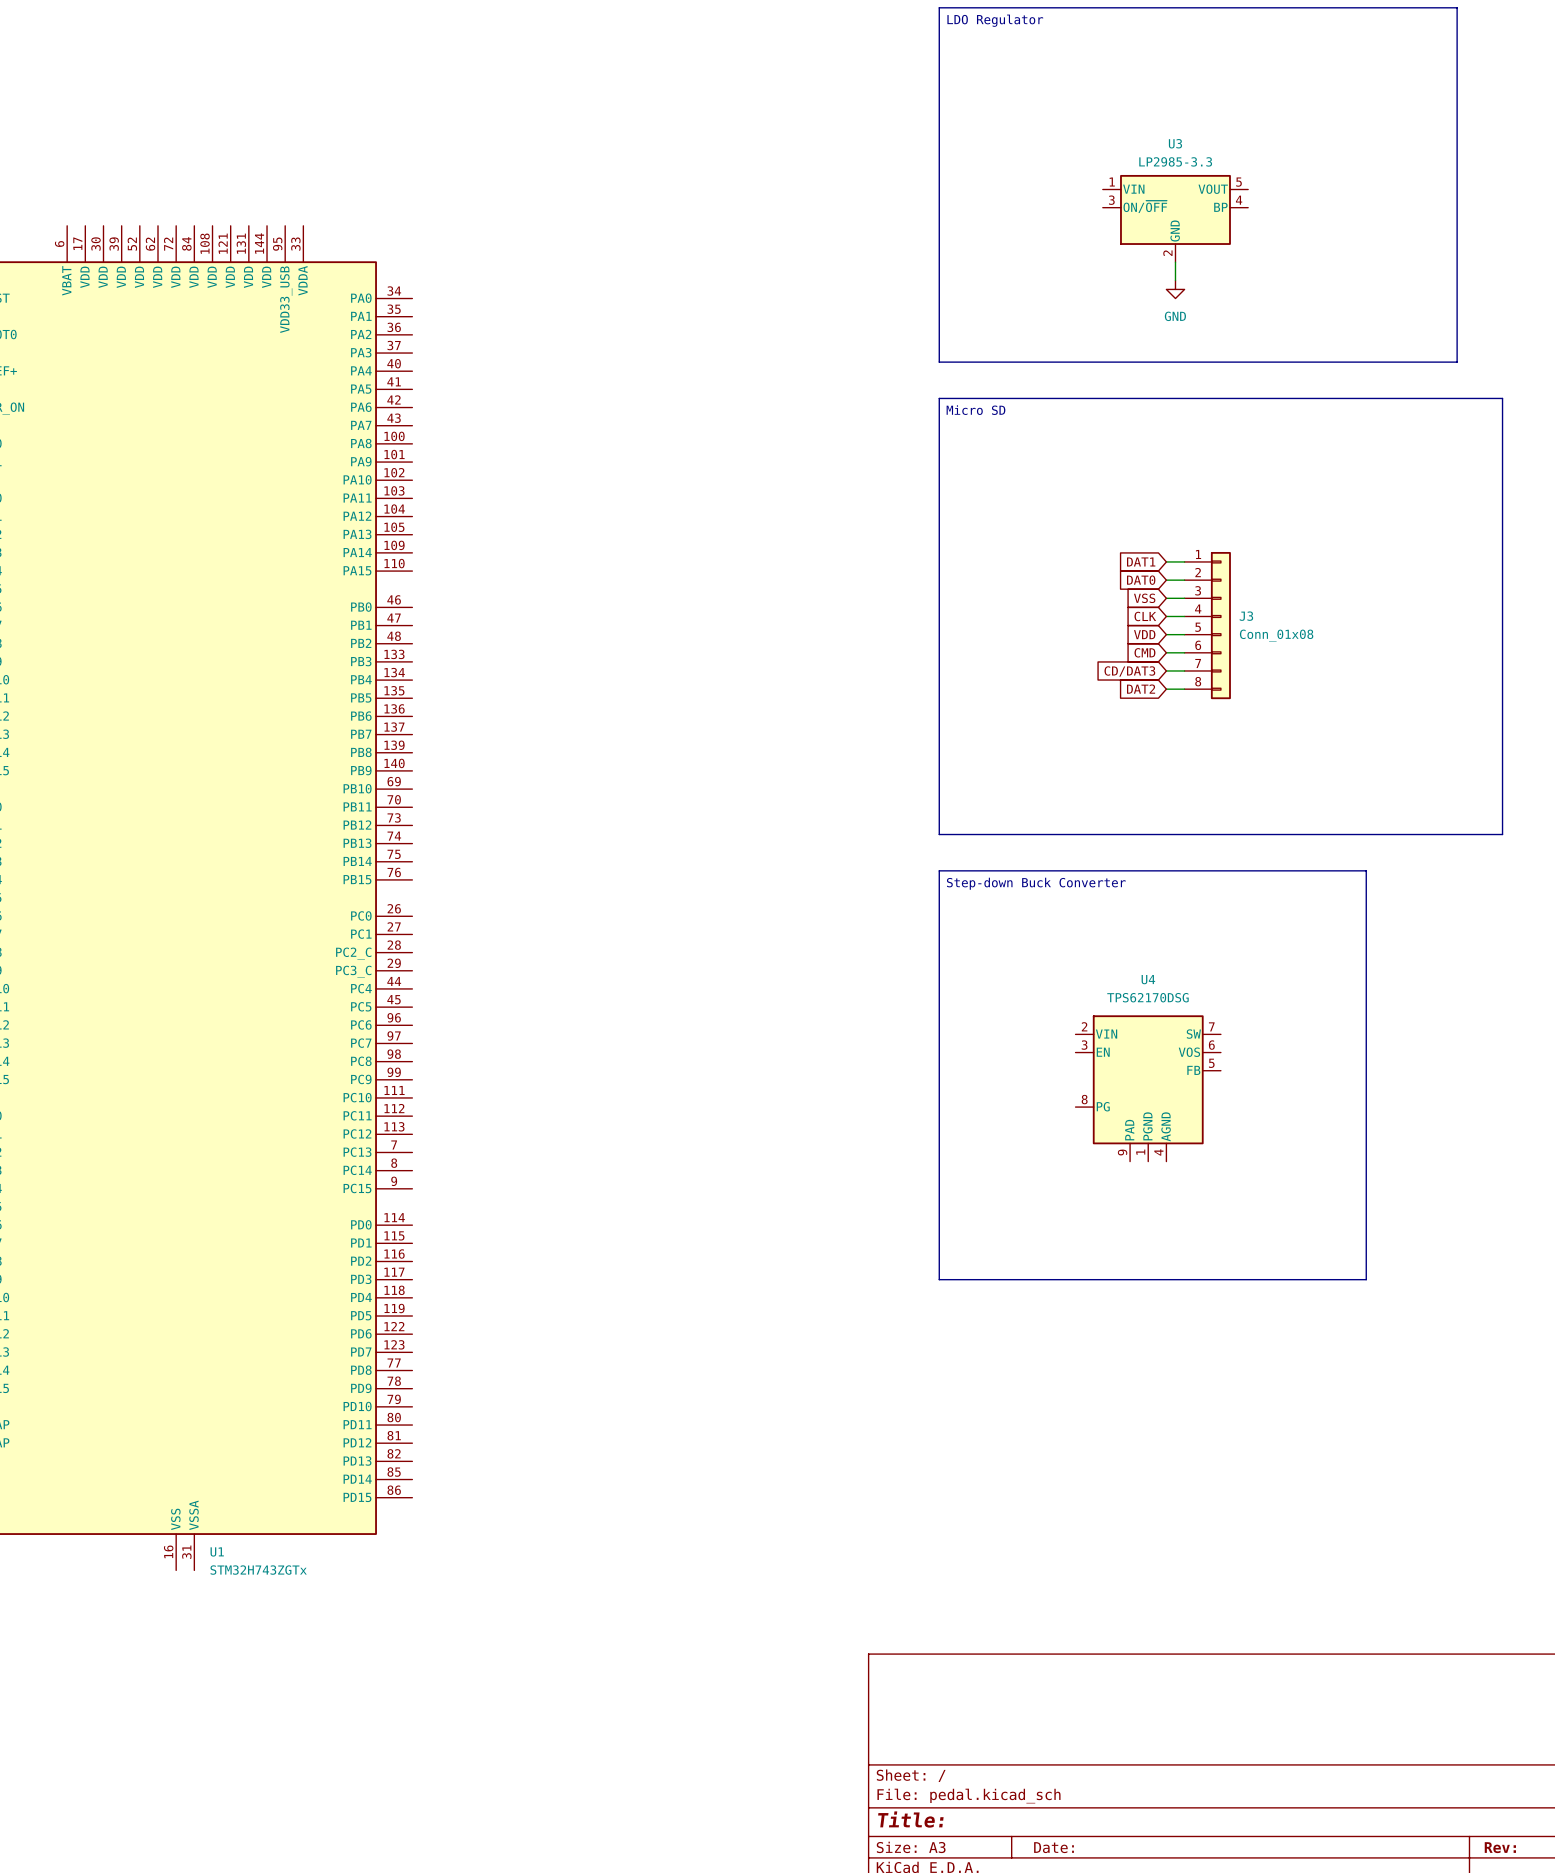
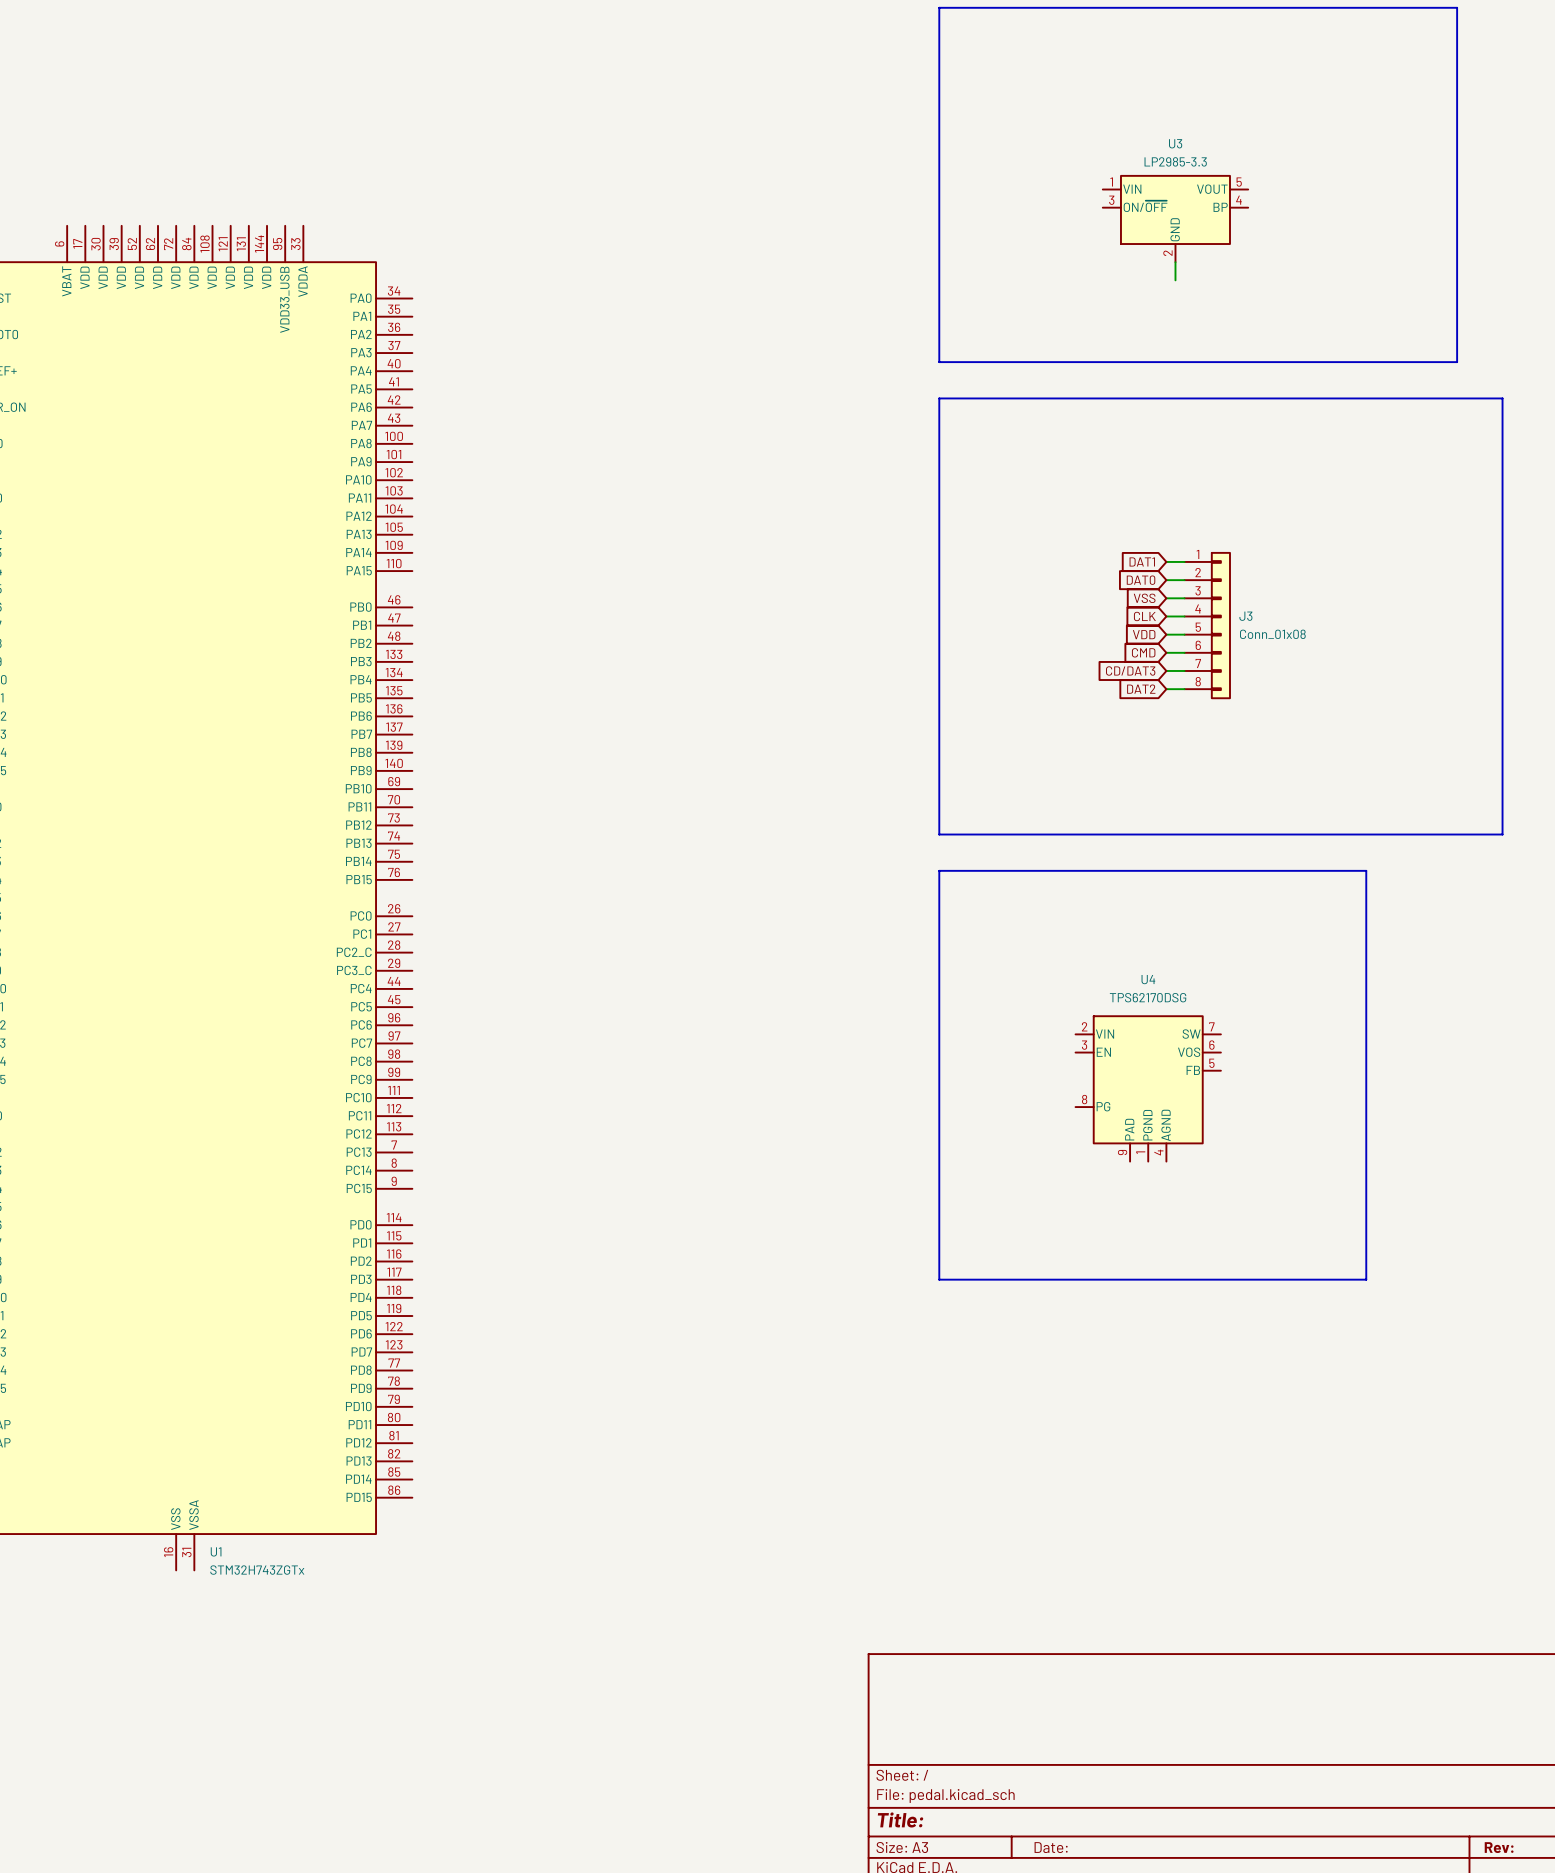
text: LDO Regulator (995, 20) -> none
power symbol: GND (1175, 289) -> none
text: Micro SD (975, 410) -> none
text: Step-down Buck Converter (1036, 883) -> none

